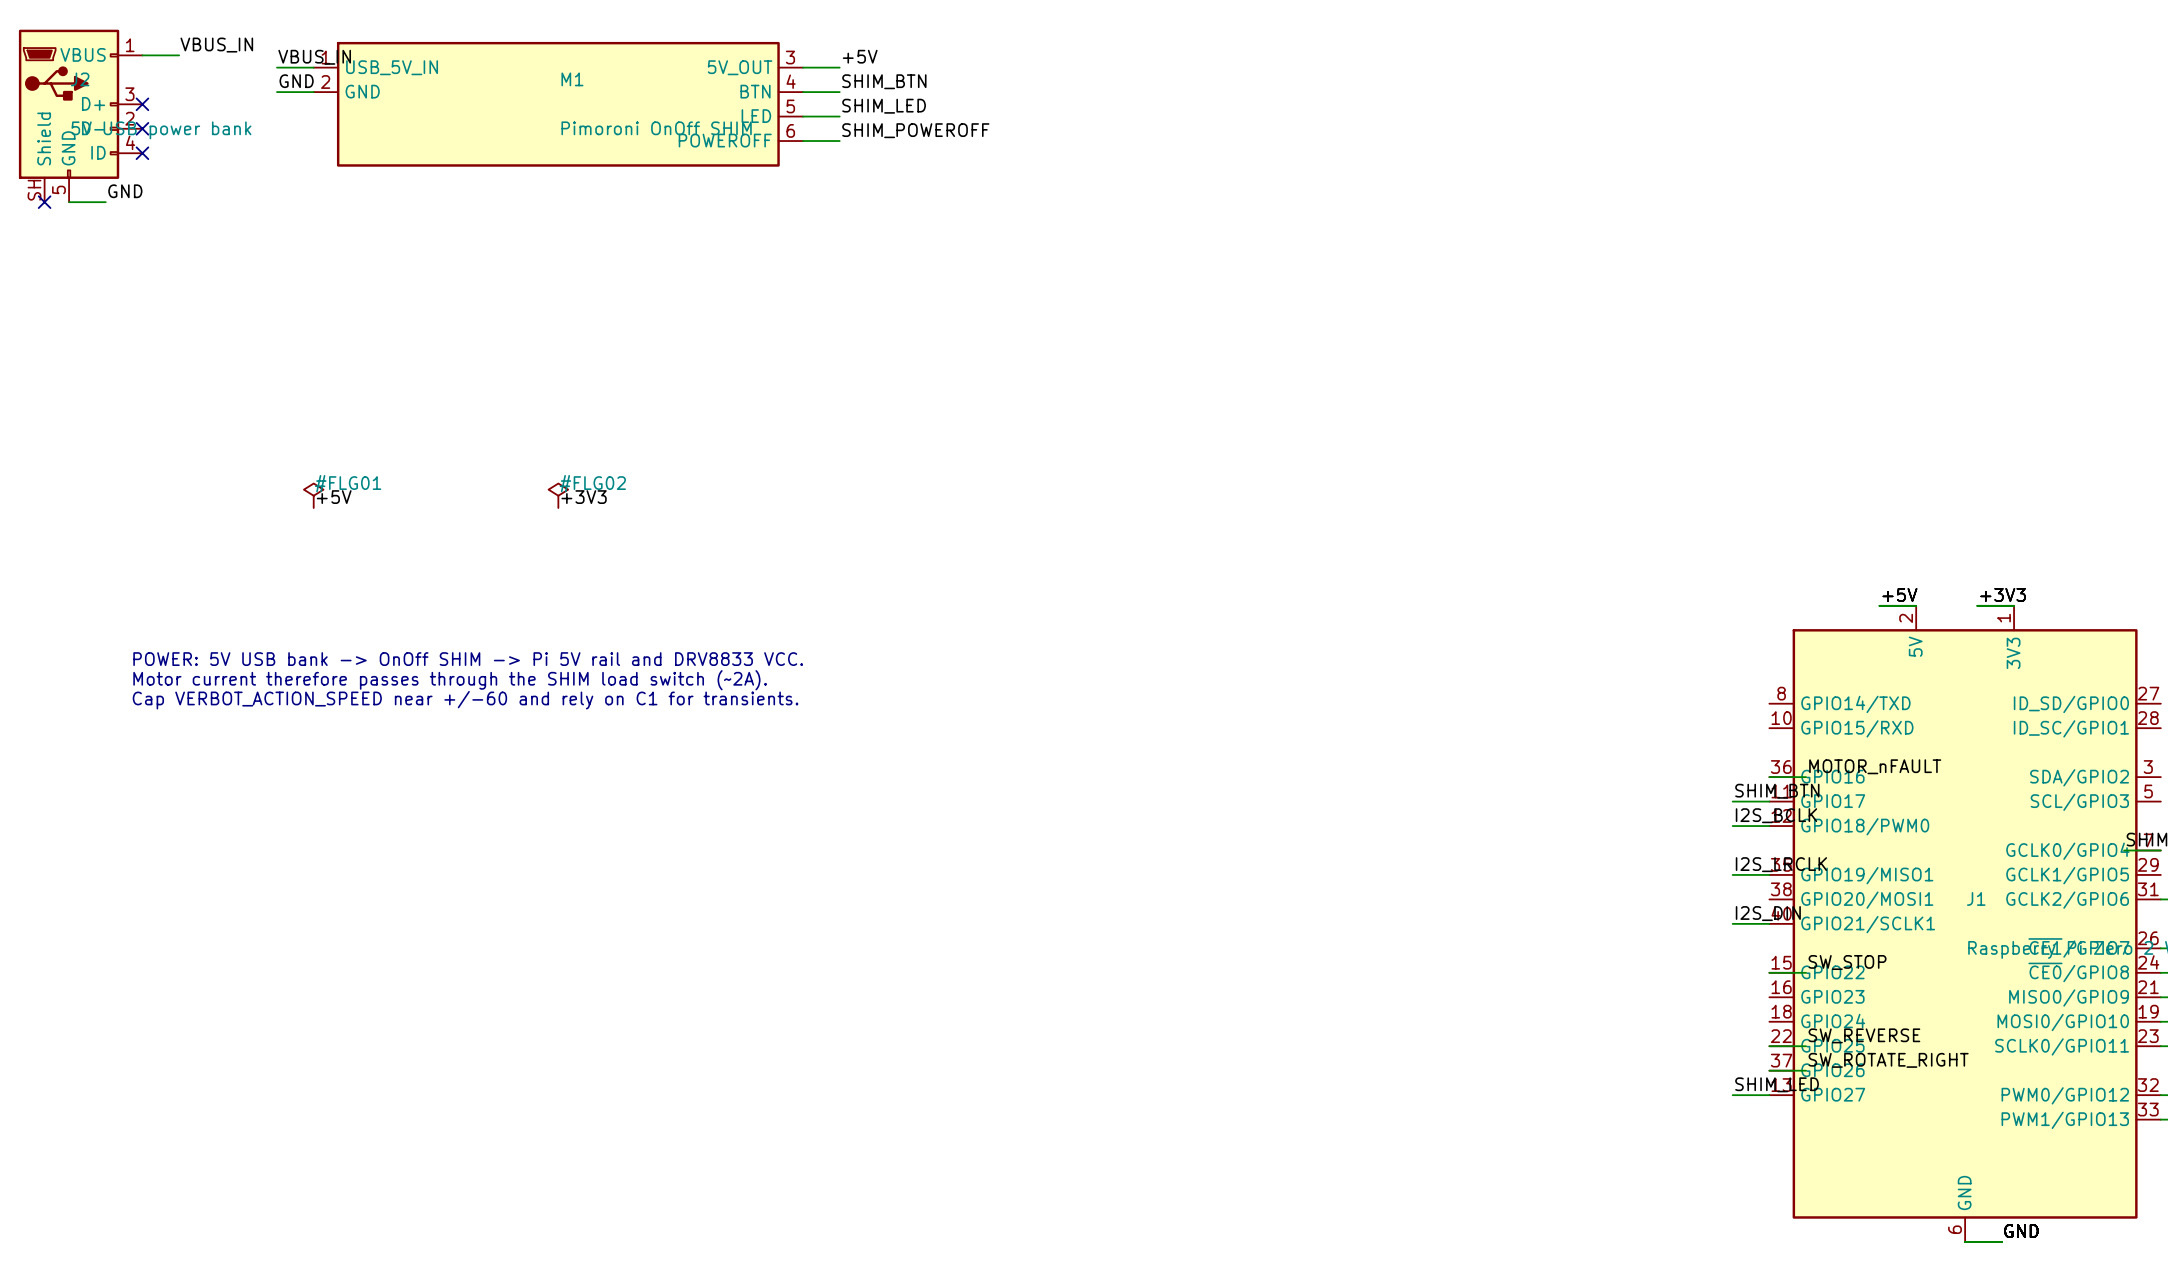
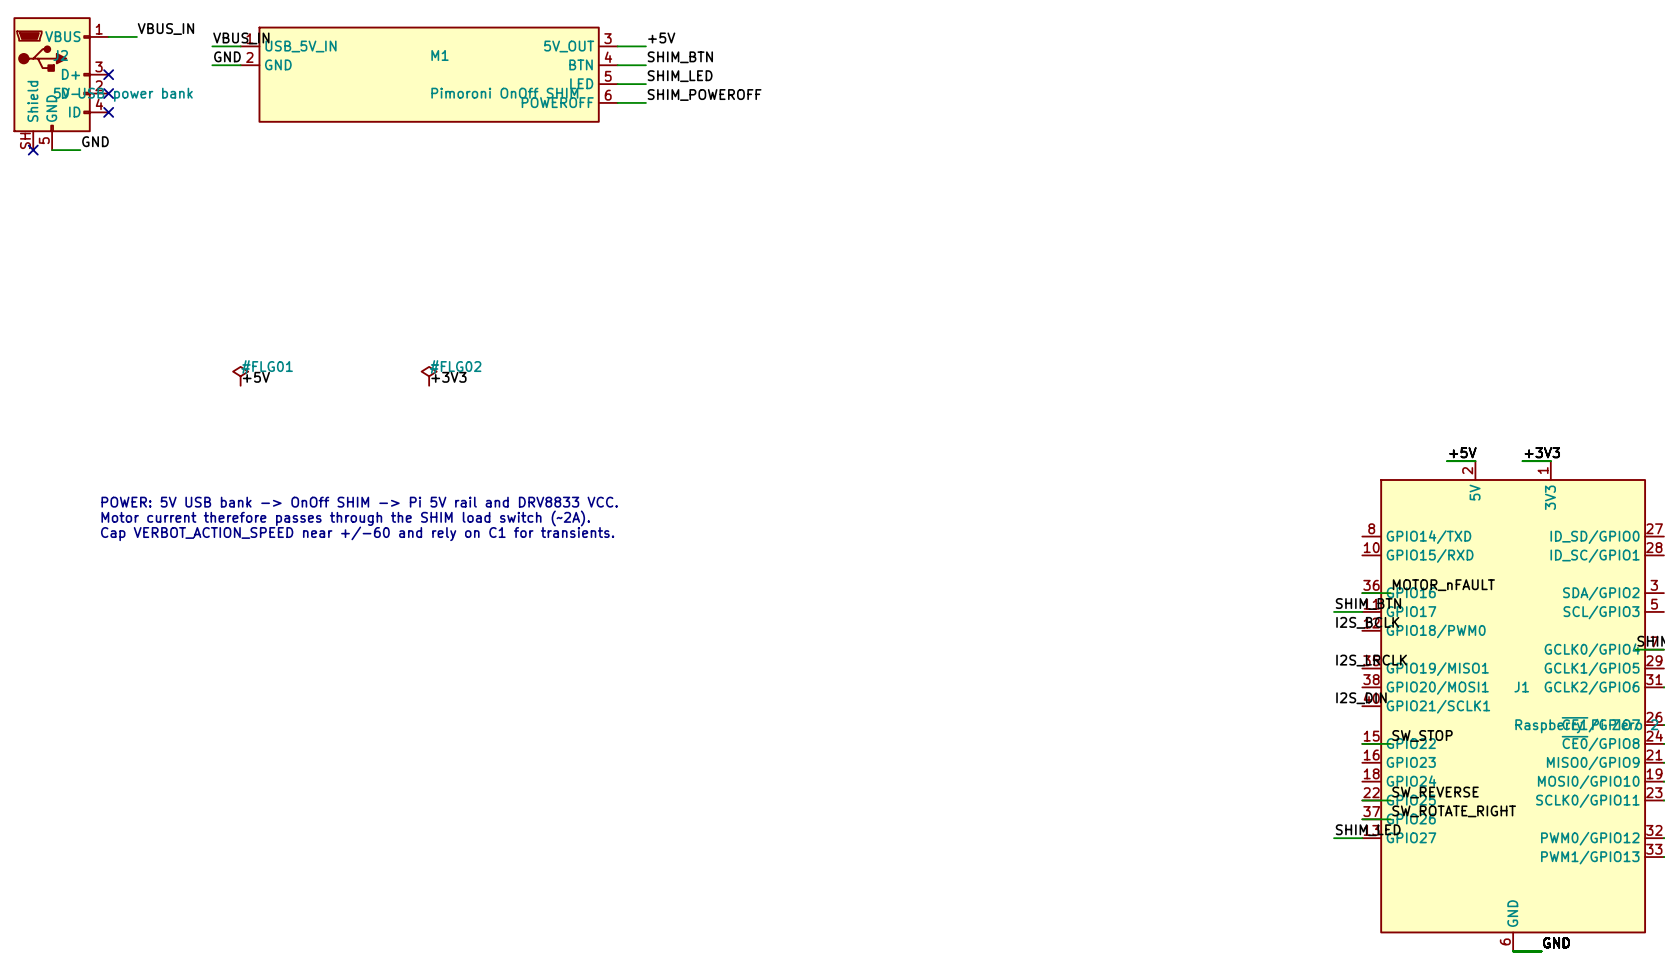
wire: (1732, 826) (1769, 826) -> none
wire: (1732, 874) (1769, 874) -> none
wire: (1732, 923) (1769, 923) -> none

